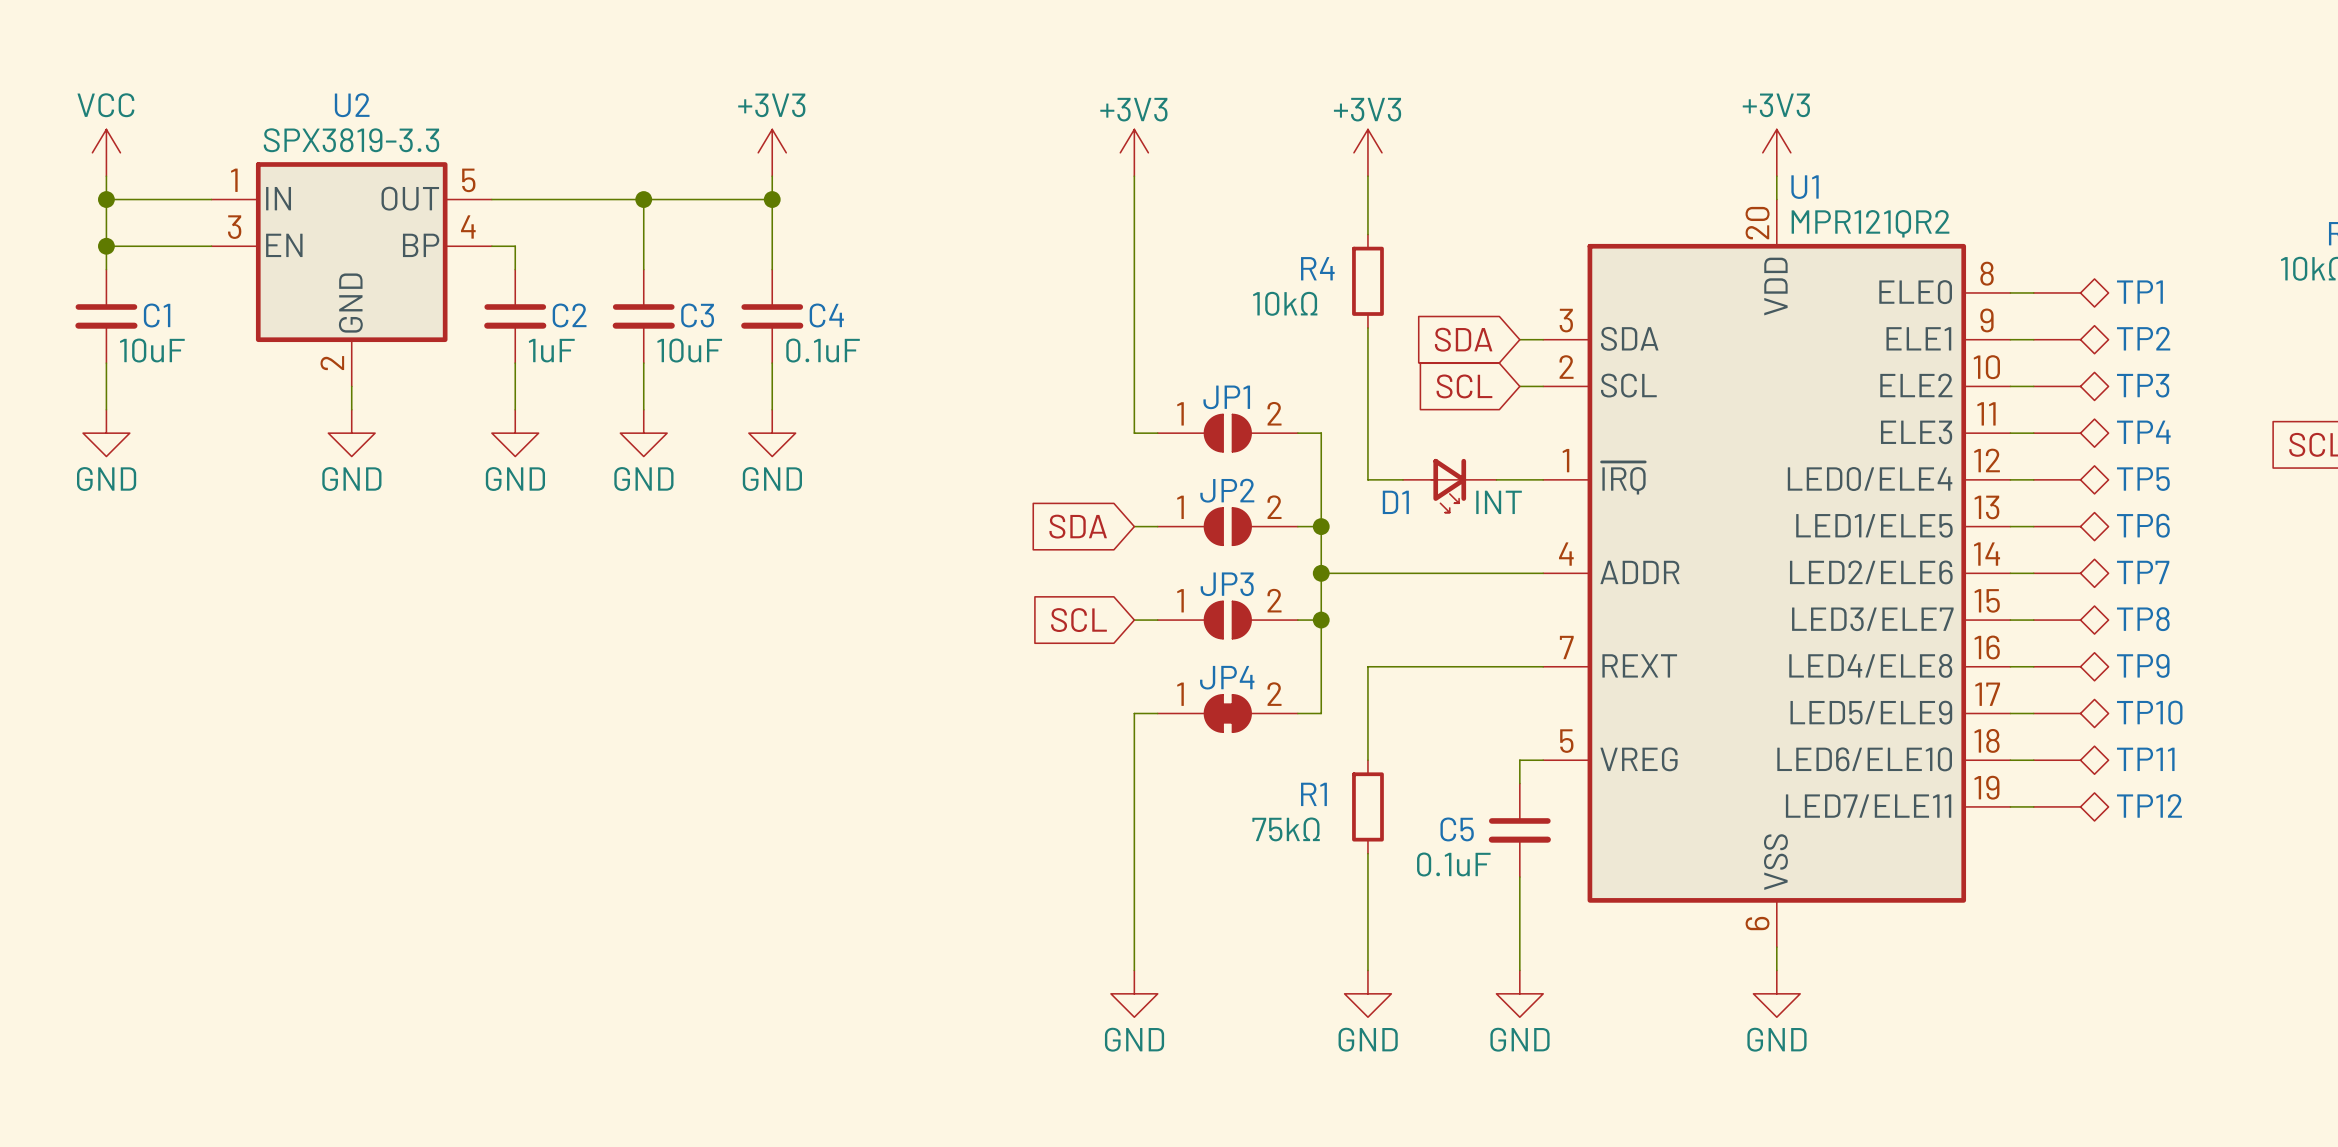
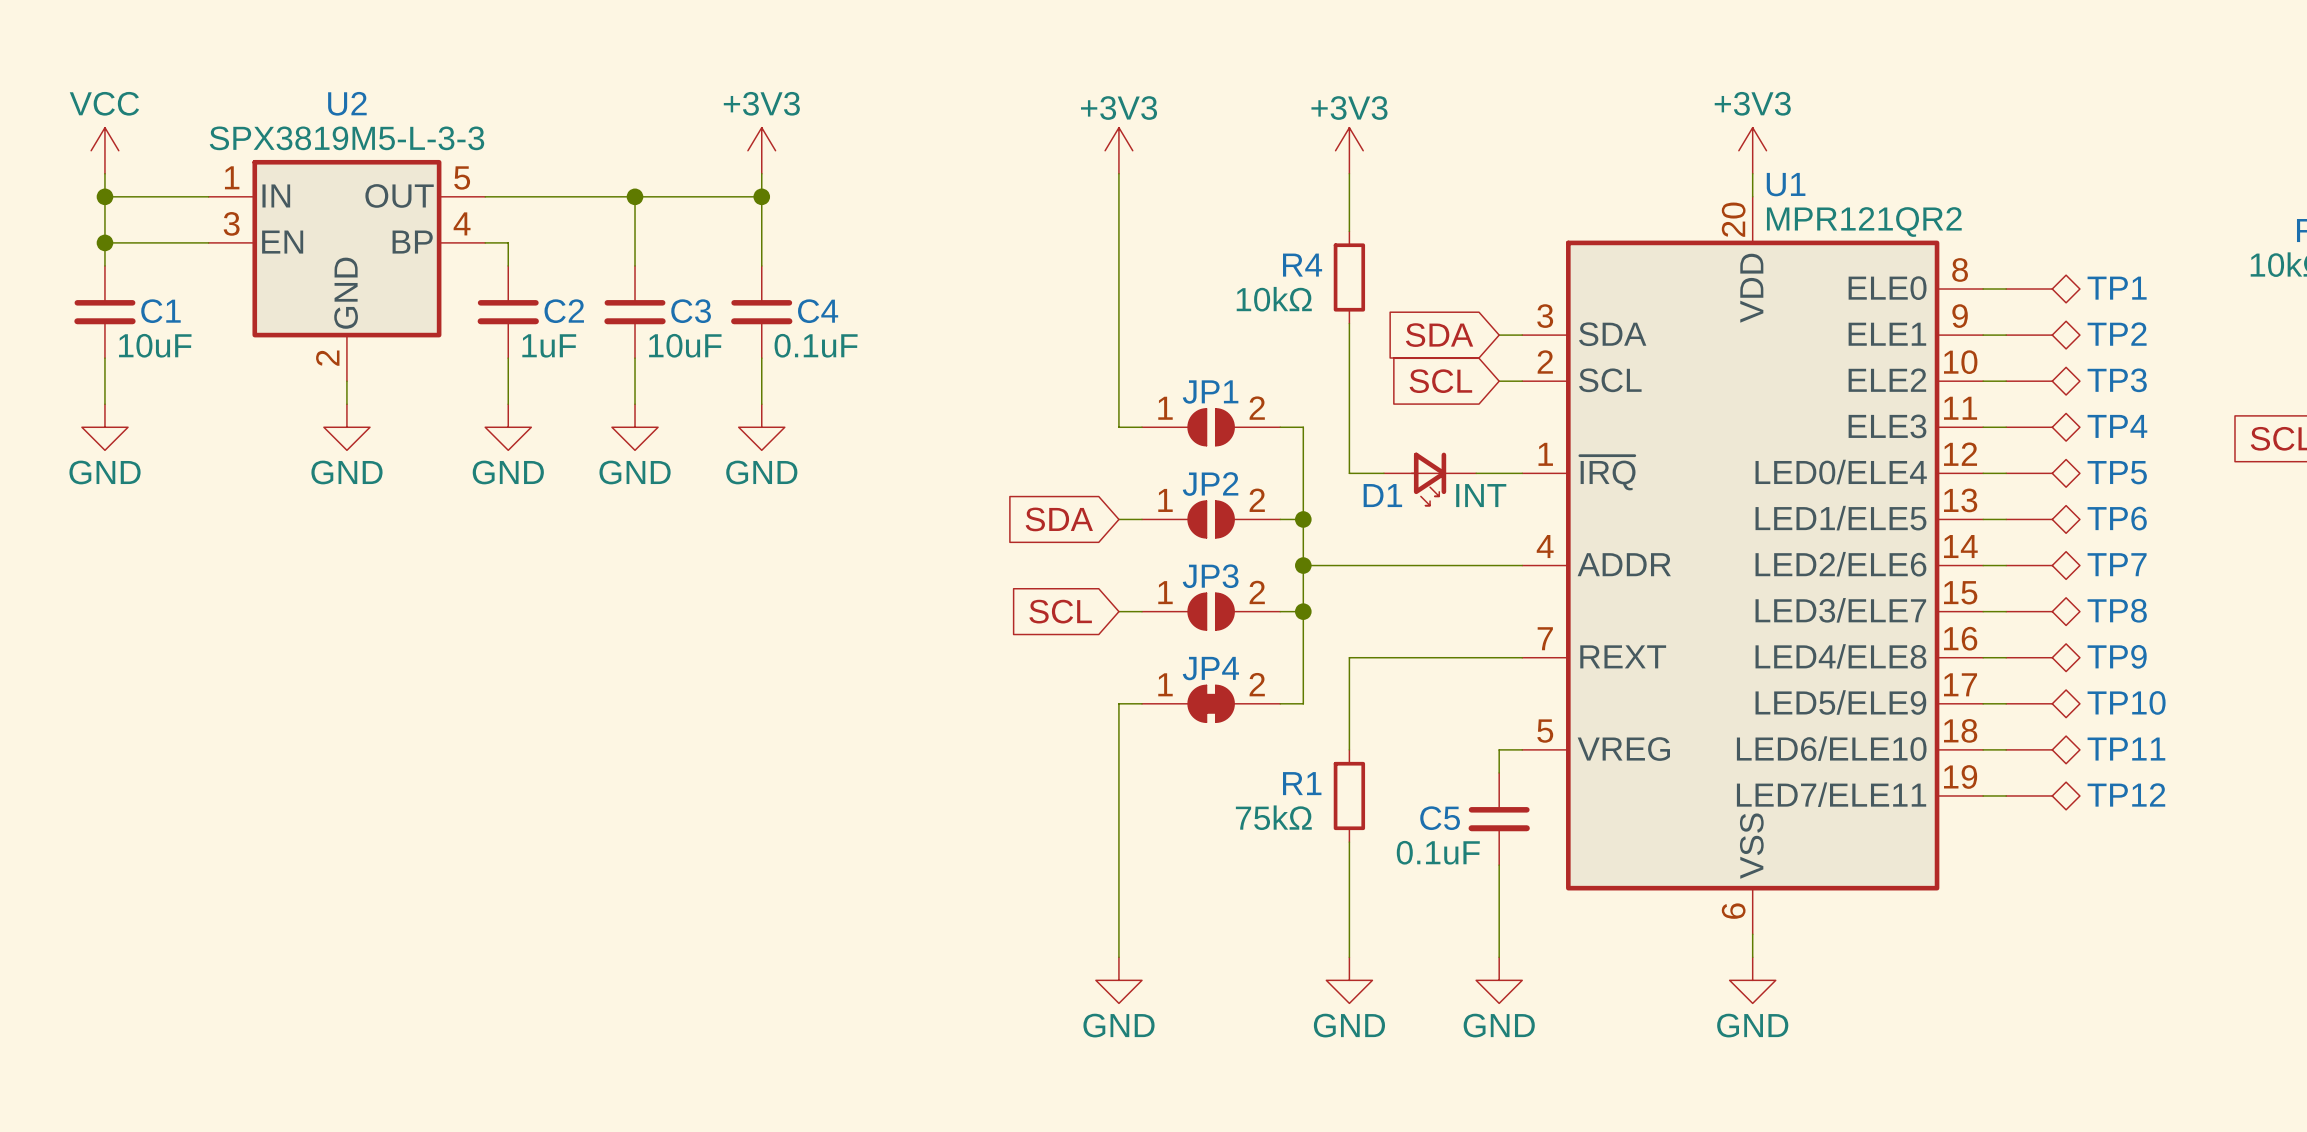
U2 value: SPX3819-3.3 (351, 140) -> SPX3819M5-L-3-3 (346, 138)

